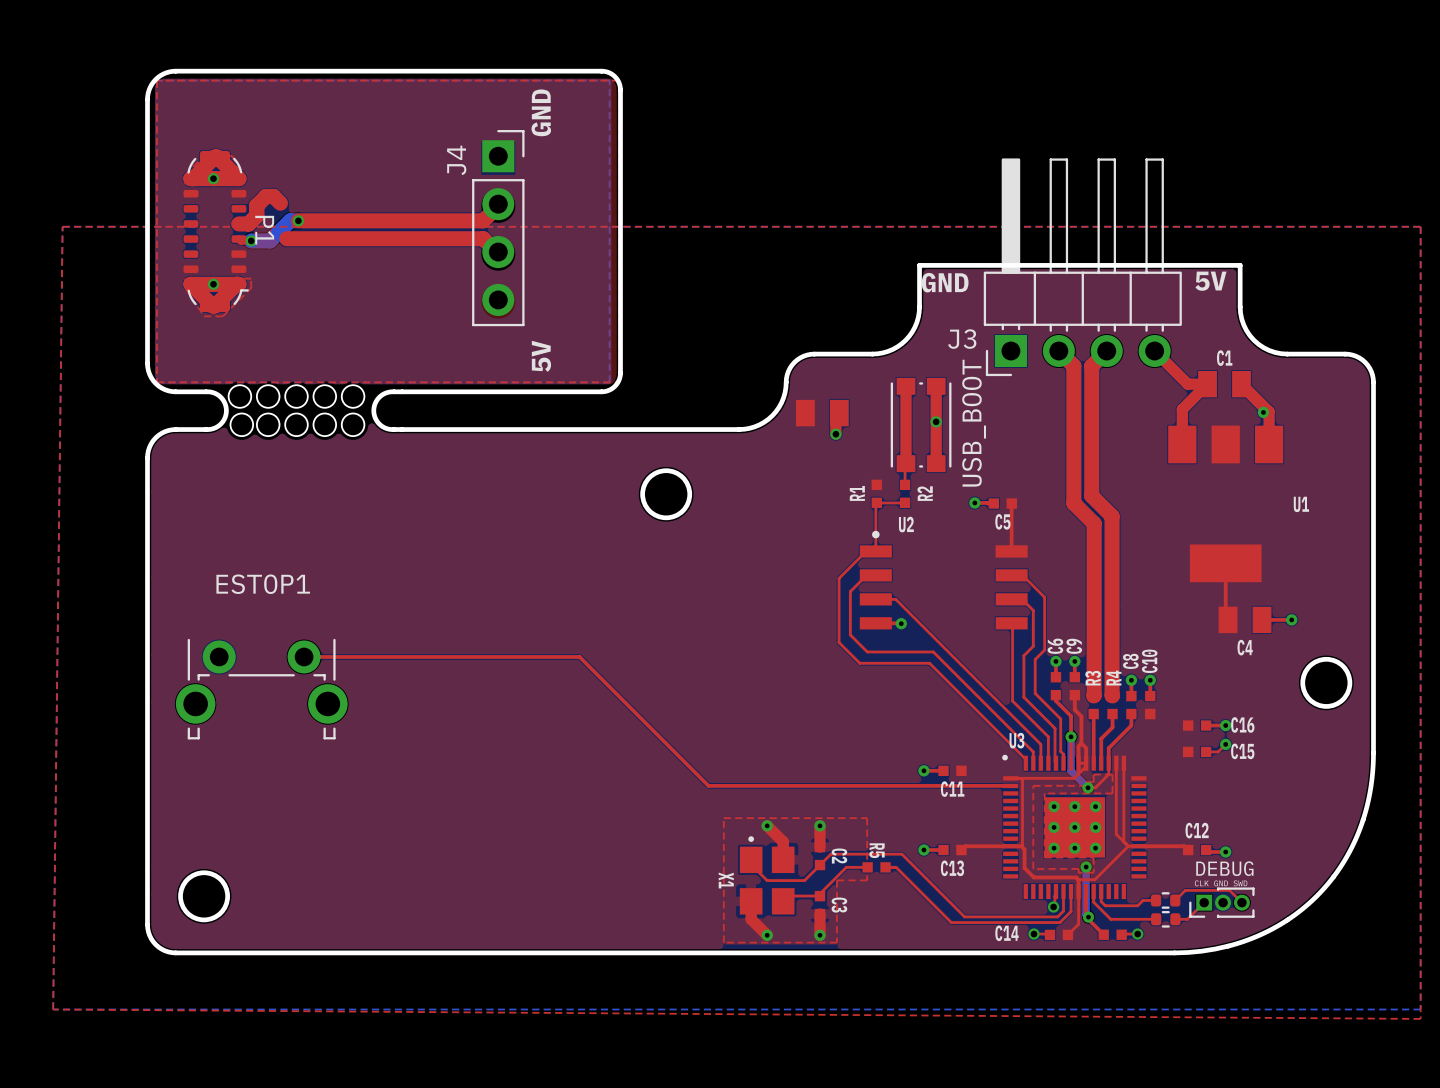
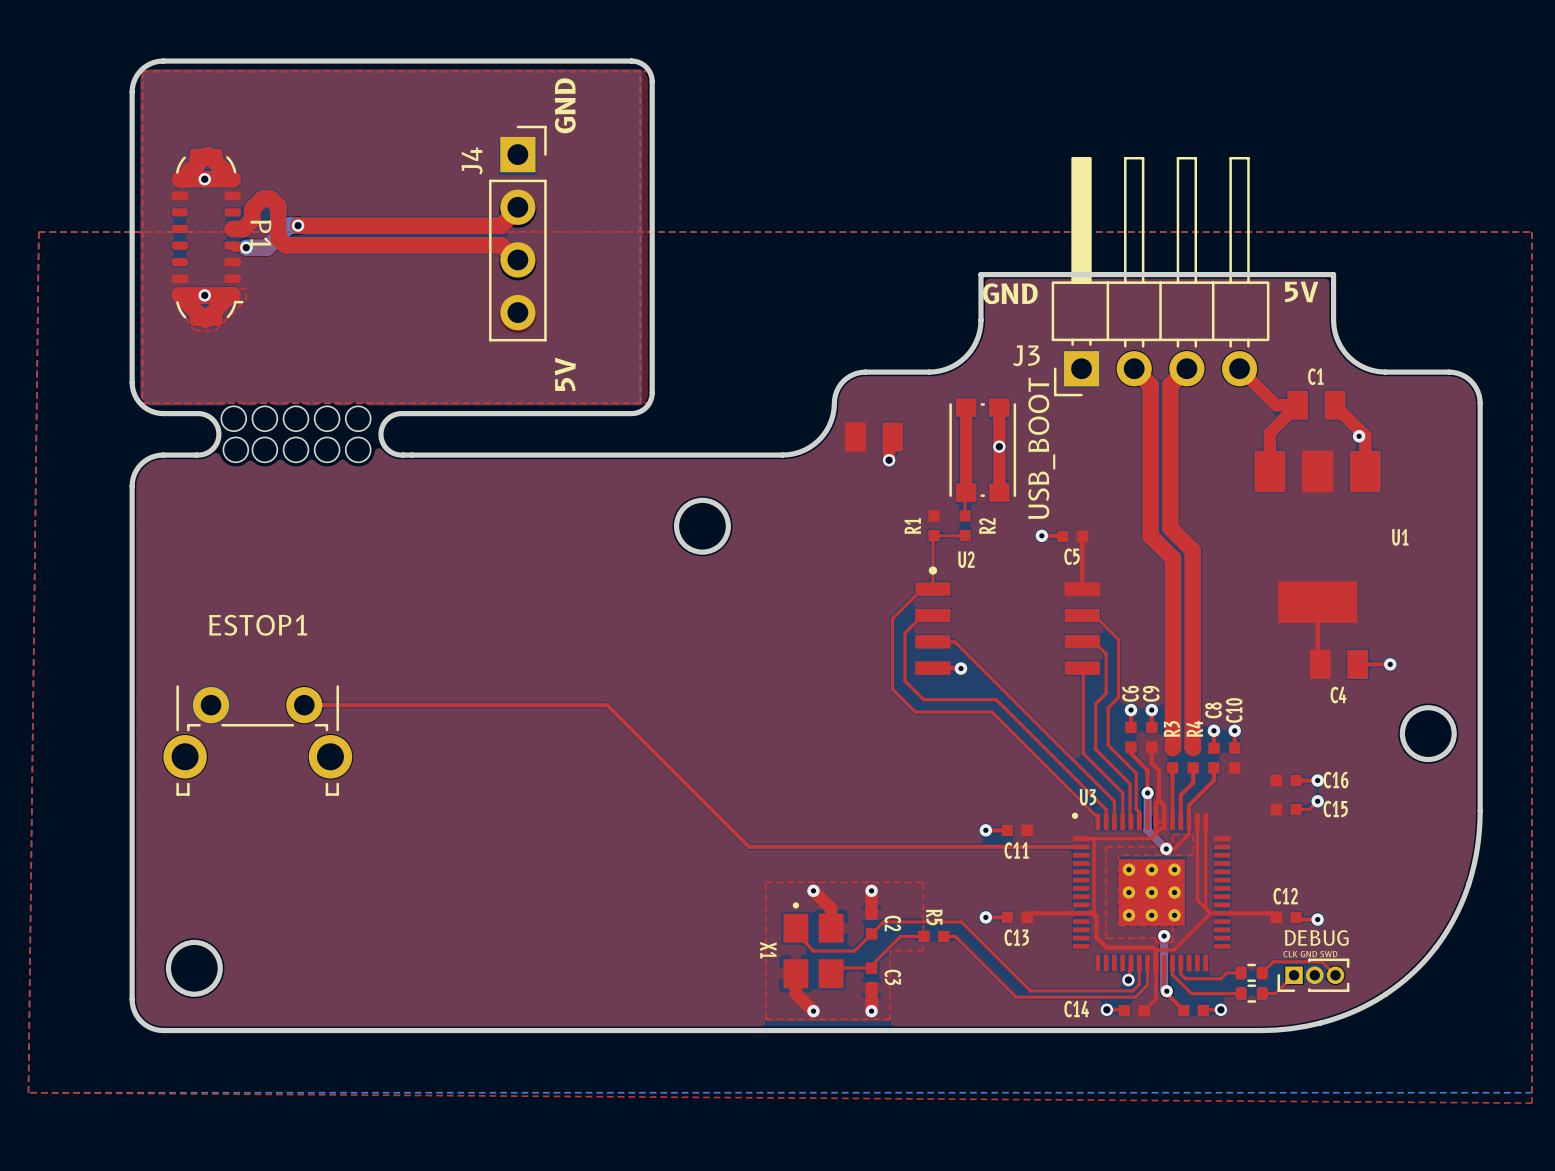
top track: none -> (278, 206) (278, 238) (285, 245)

